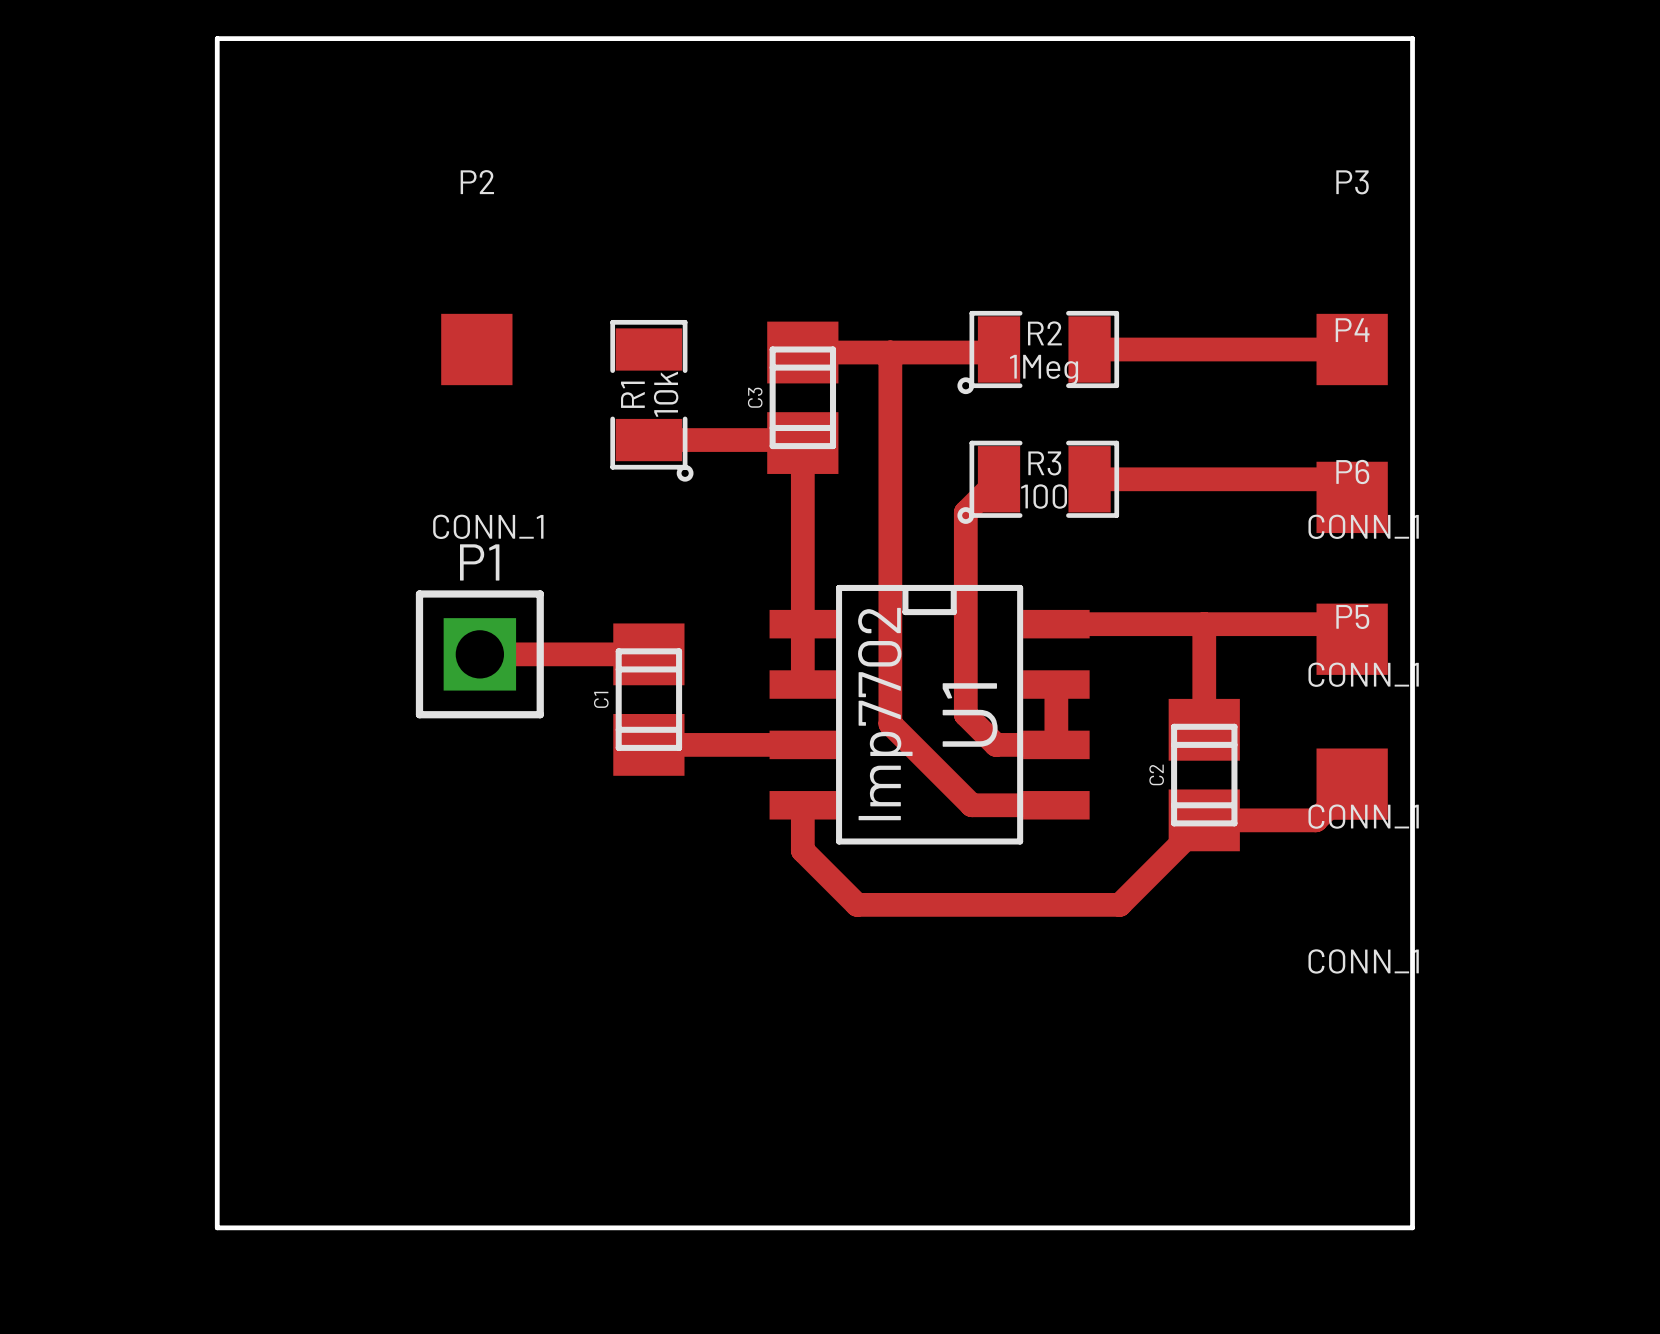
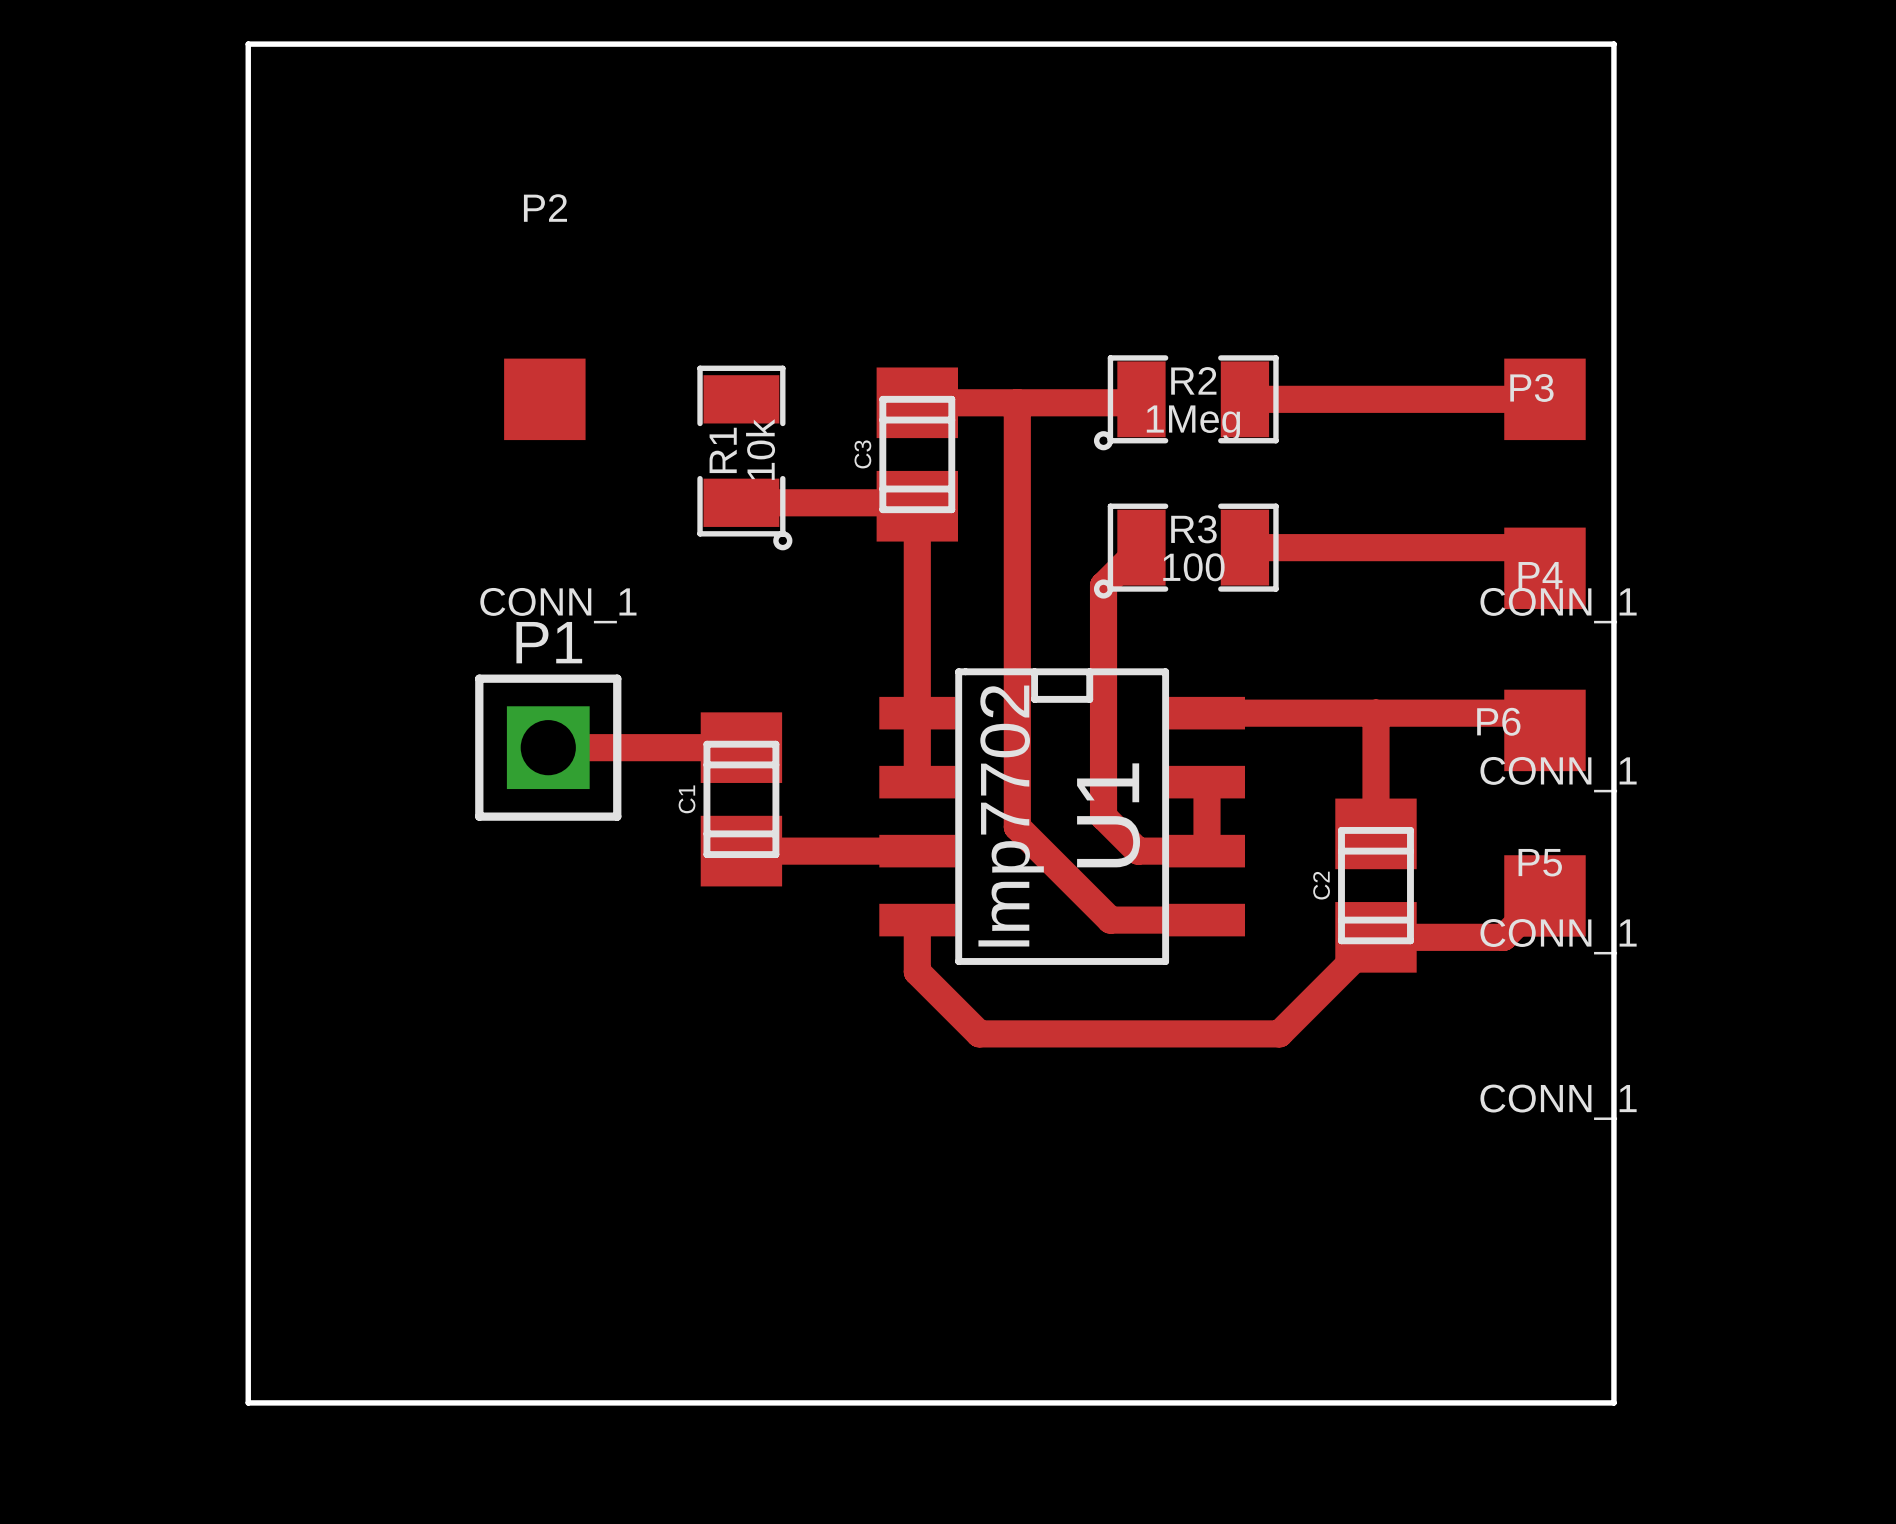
P3 name position: P3 (1352, 182) -> P3 (1531, 387)
P4 name position: P4 (1352, 330) -> P4 (1540, 575)
P6 name position: P6 (1352, 471) -> P6 (1498, 721)
P5 name position: P5 (1352, 616) -> P5 (1540, 862)

